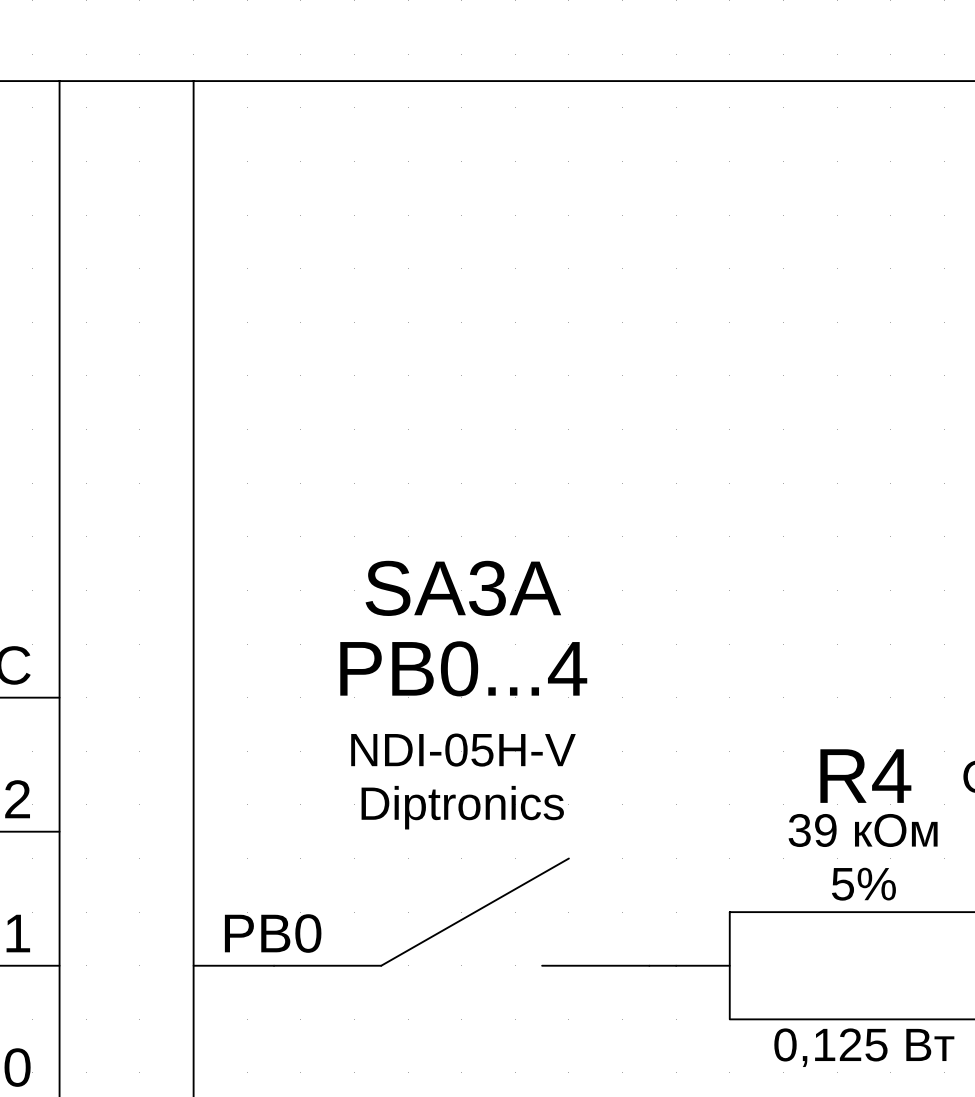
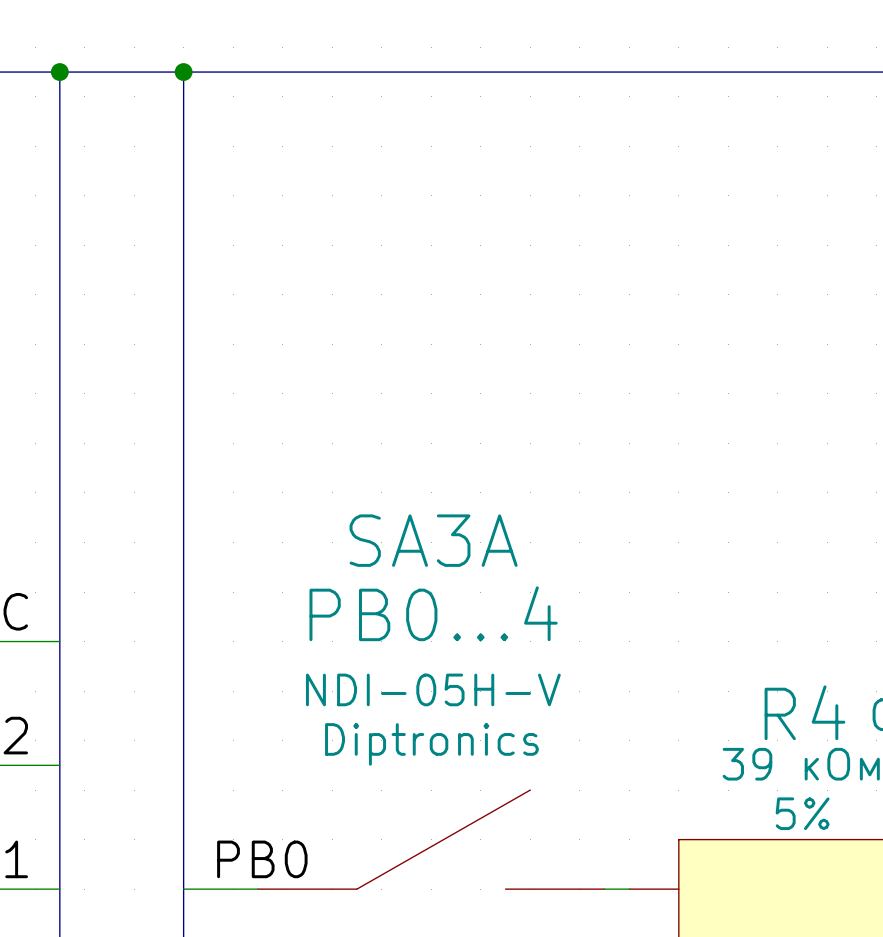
junction: none -> (59, 72)
junction: none -> (183, 72)

